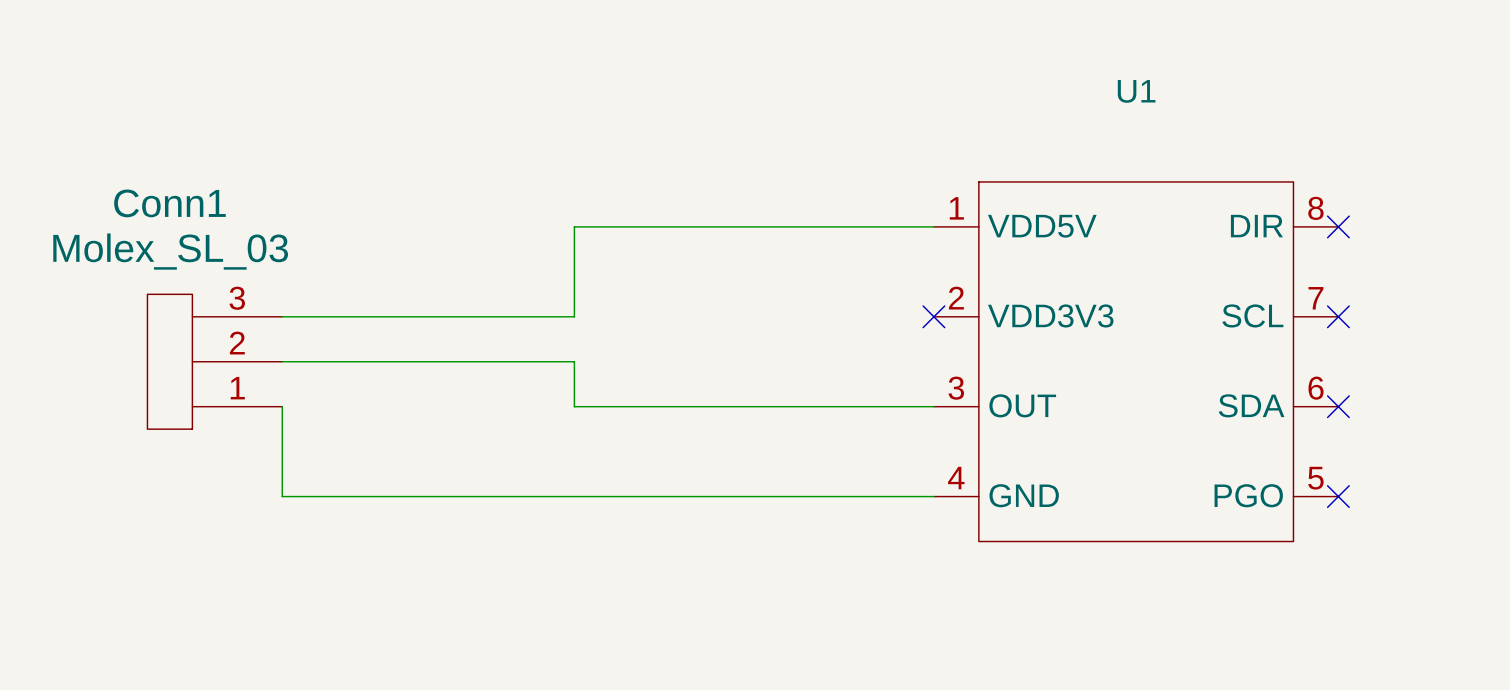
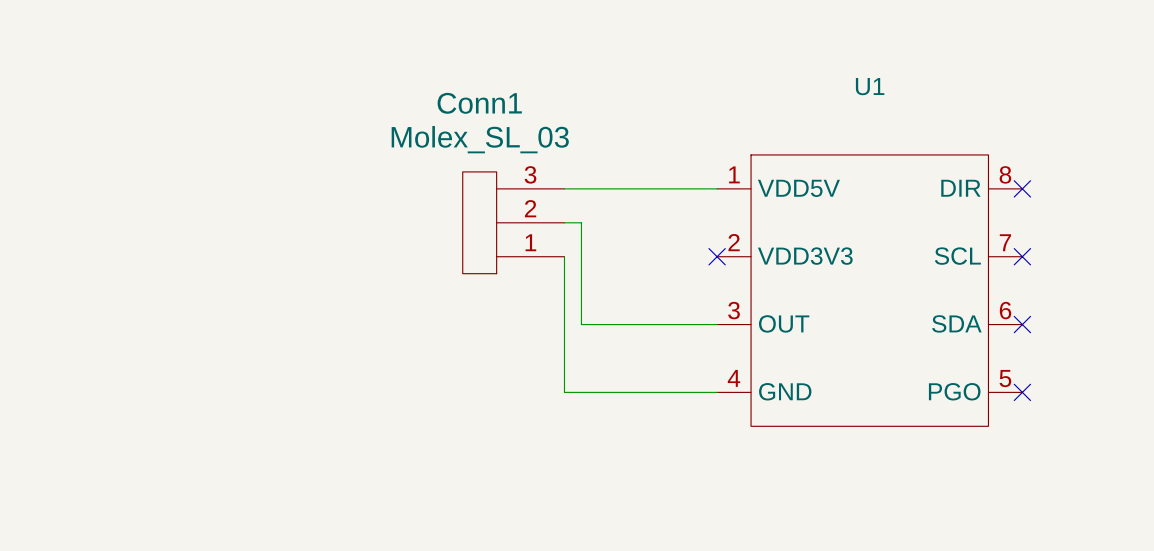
wire: (731, 226) (574, 226) (574, 316) (282, 316) -> none
Conn1 position: (214, 361) -> (513, 222)
wire: (282, 361) (574, 361) (574, 406) (754, 406) -> (564, 222) (581, 222) (581, 324)
wire: (282, 406) (282, 496) (731, 496) -> (564, 256) (564, 392)

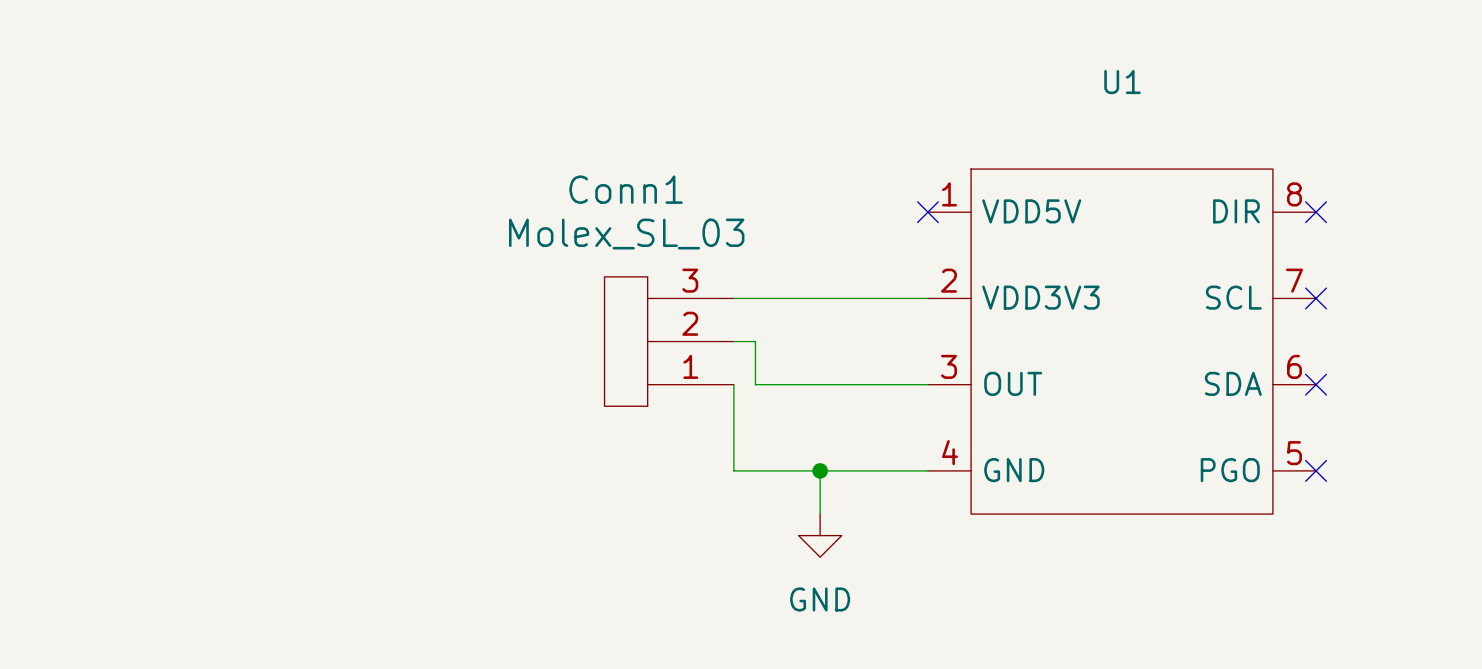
wire: (564, 188) (717, 188) -> none
Conn1 position: (513, 222) -> (669, 341)
wire: (564, 222) (581, 222) (581, 290) -> (733, 341) (755, 341)
wire: (564, 256) (564, 324) -> (733, 298) (927, 298)
no-connect mark position: (717, 256) -> (927, 212)
wire: none -> (820, 470) (820, 514)
junction: none -> (820, 470)
power symbol: none -> GND (820, 535)

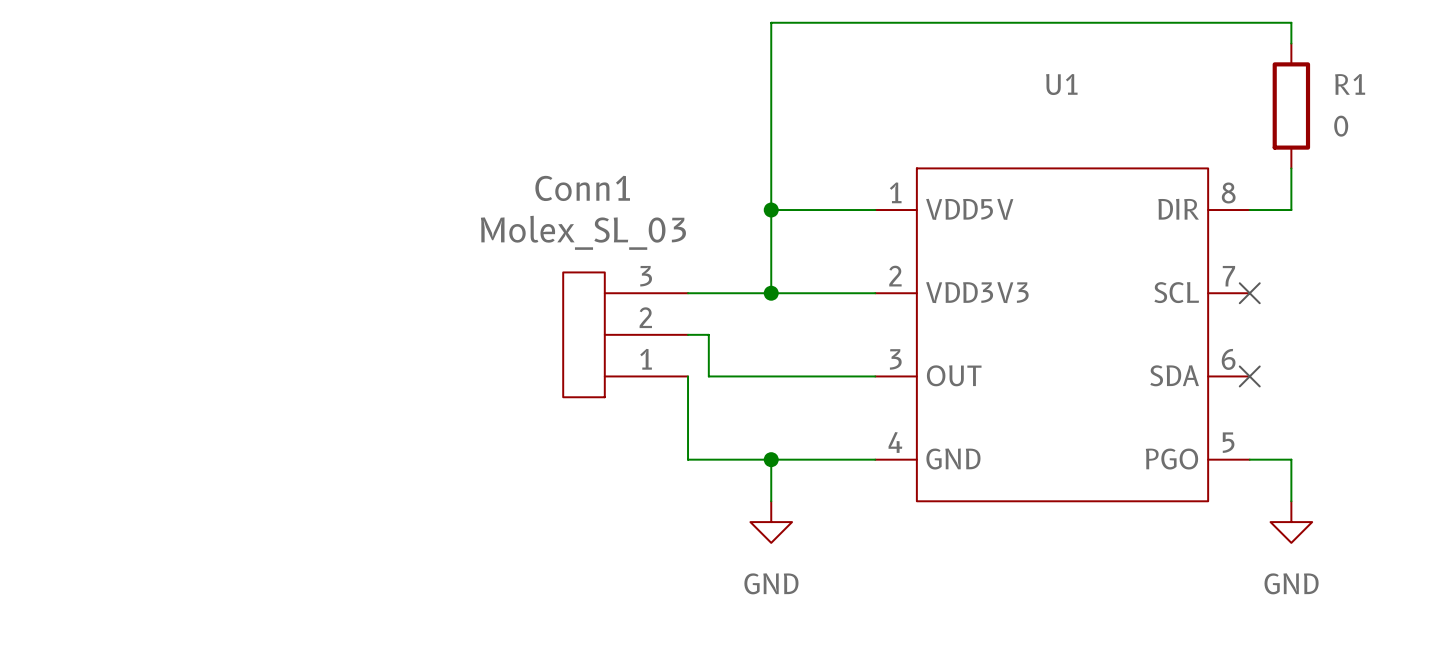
wire: none -> (1291, 43) (1291, 22) (771, 22) (771, 293)
R1: none -> 0 (1291, 105)
wire: none -> (1291, 168) (1291, 210) (1249, 210)
wire: none -> (771, 210) (875, 210)
junction: none -> (771, 210)
no-connect mark: (927, 212) -> none
no-connect mark: (1316, 212) -> none
junction: none -> (771, 293)
wire: none -> (1249, 459) (1291, 459) (1291, 501)
no-connect mark: (1316, 470) -> none
power symbol: none -> GND (1291, 522)

